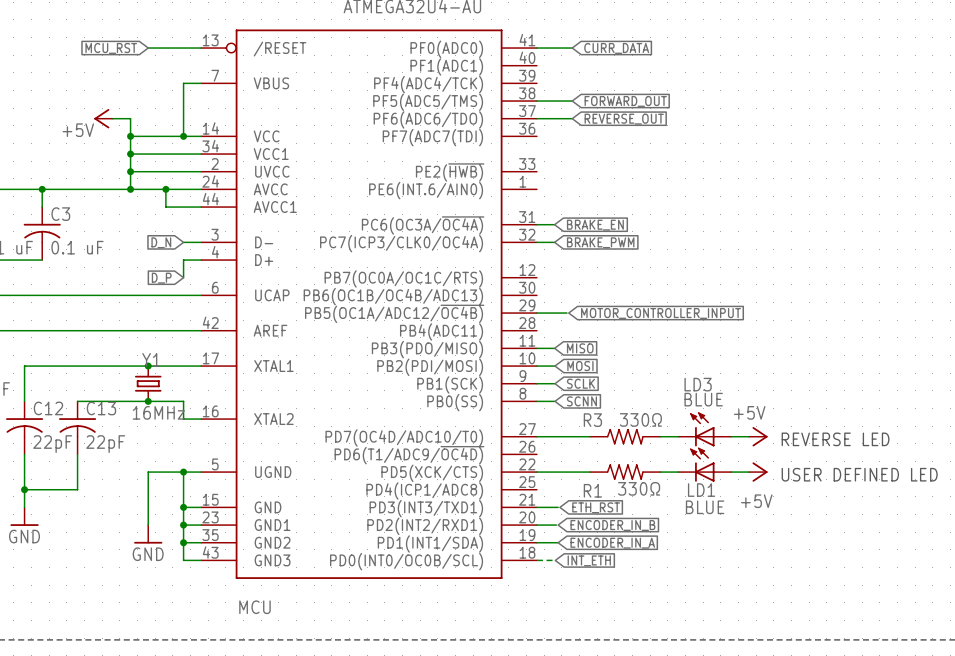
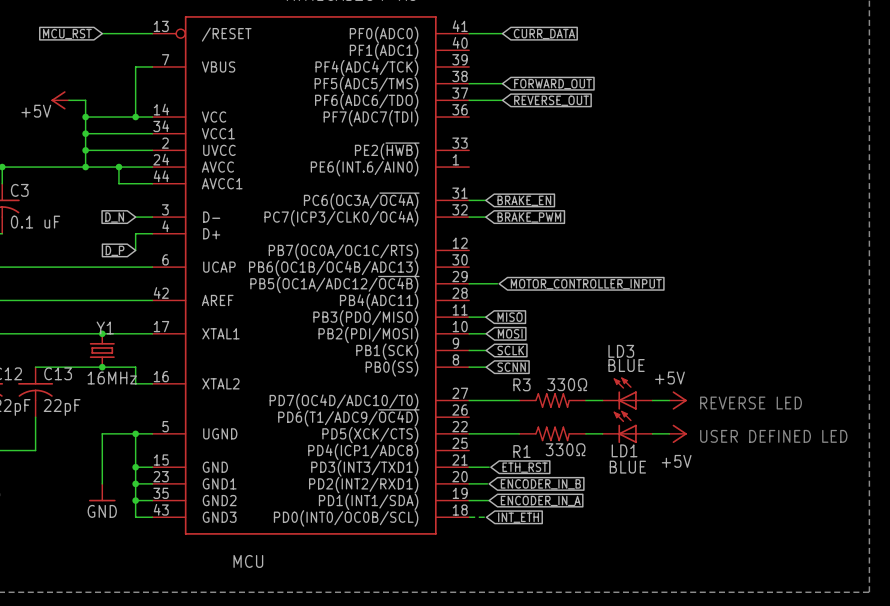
MCU name position: MCU (254, 607) -> MCU (248, 561)

